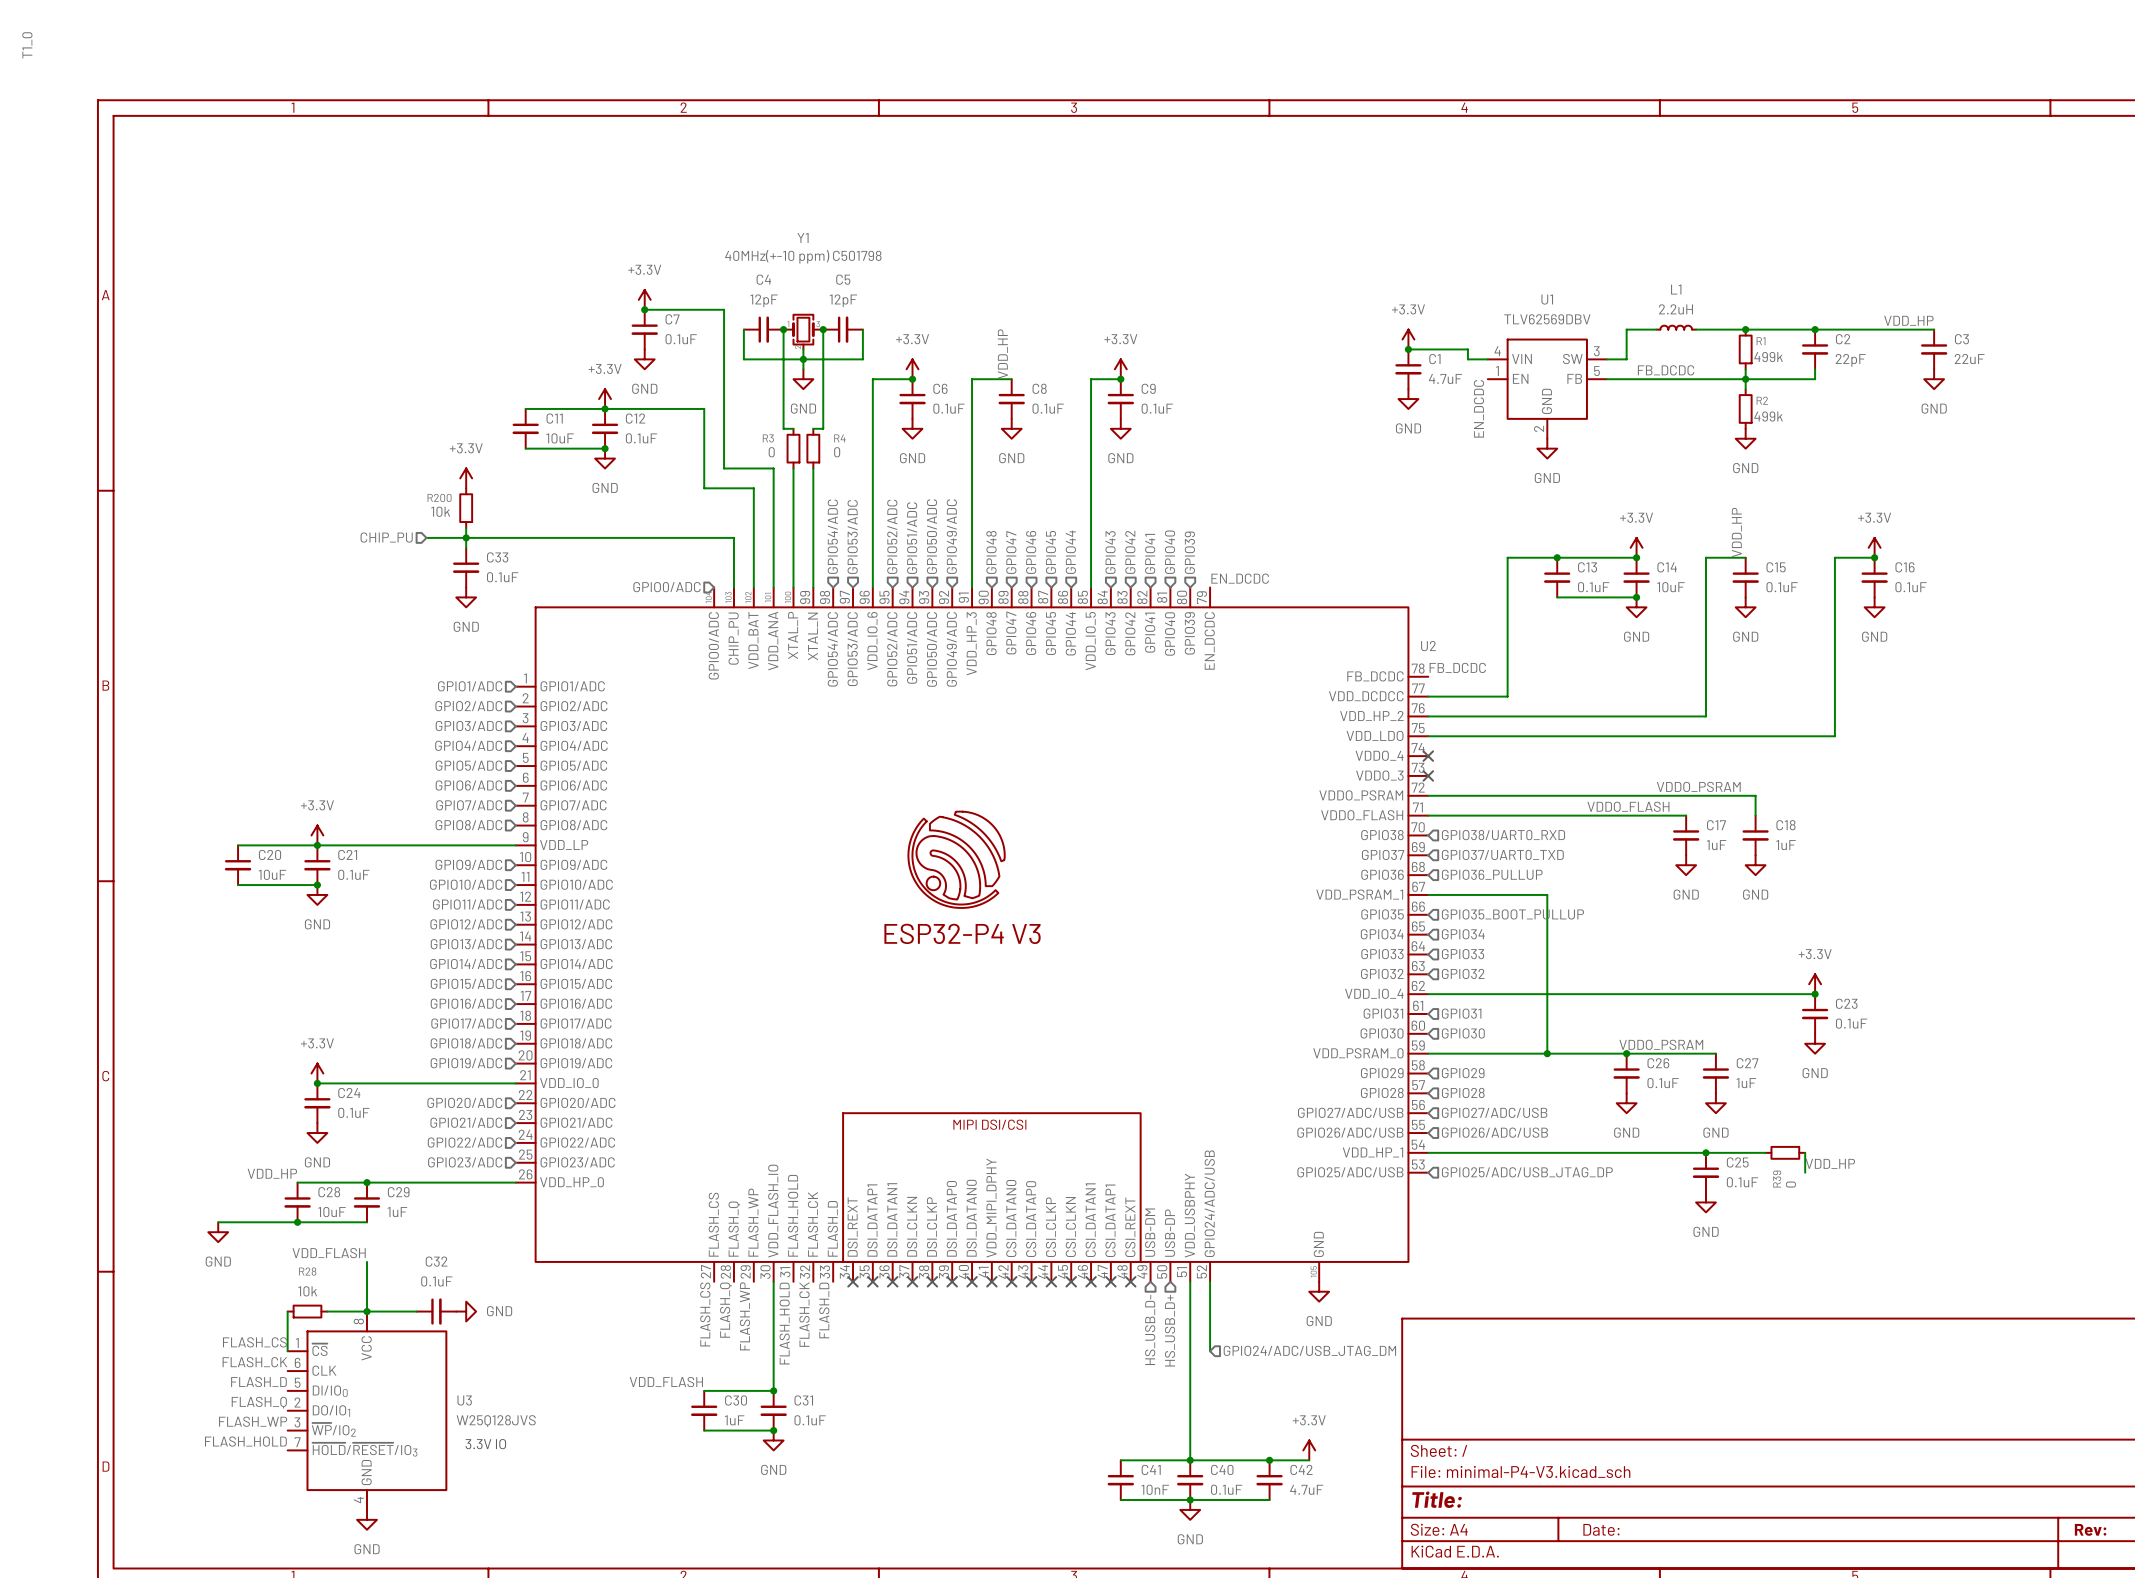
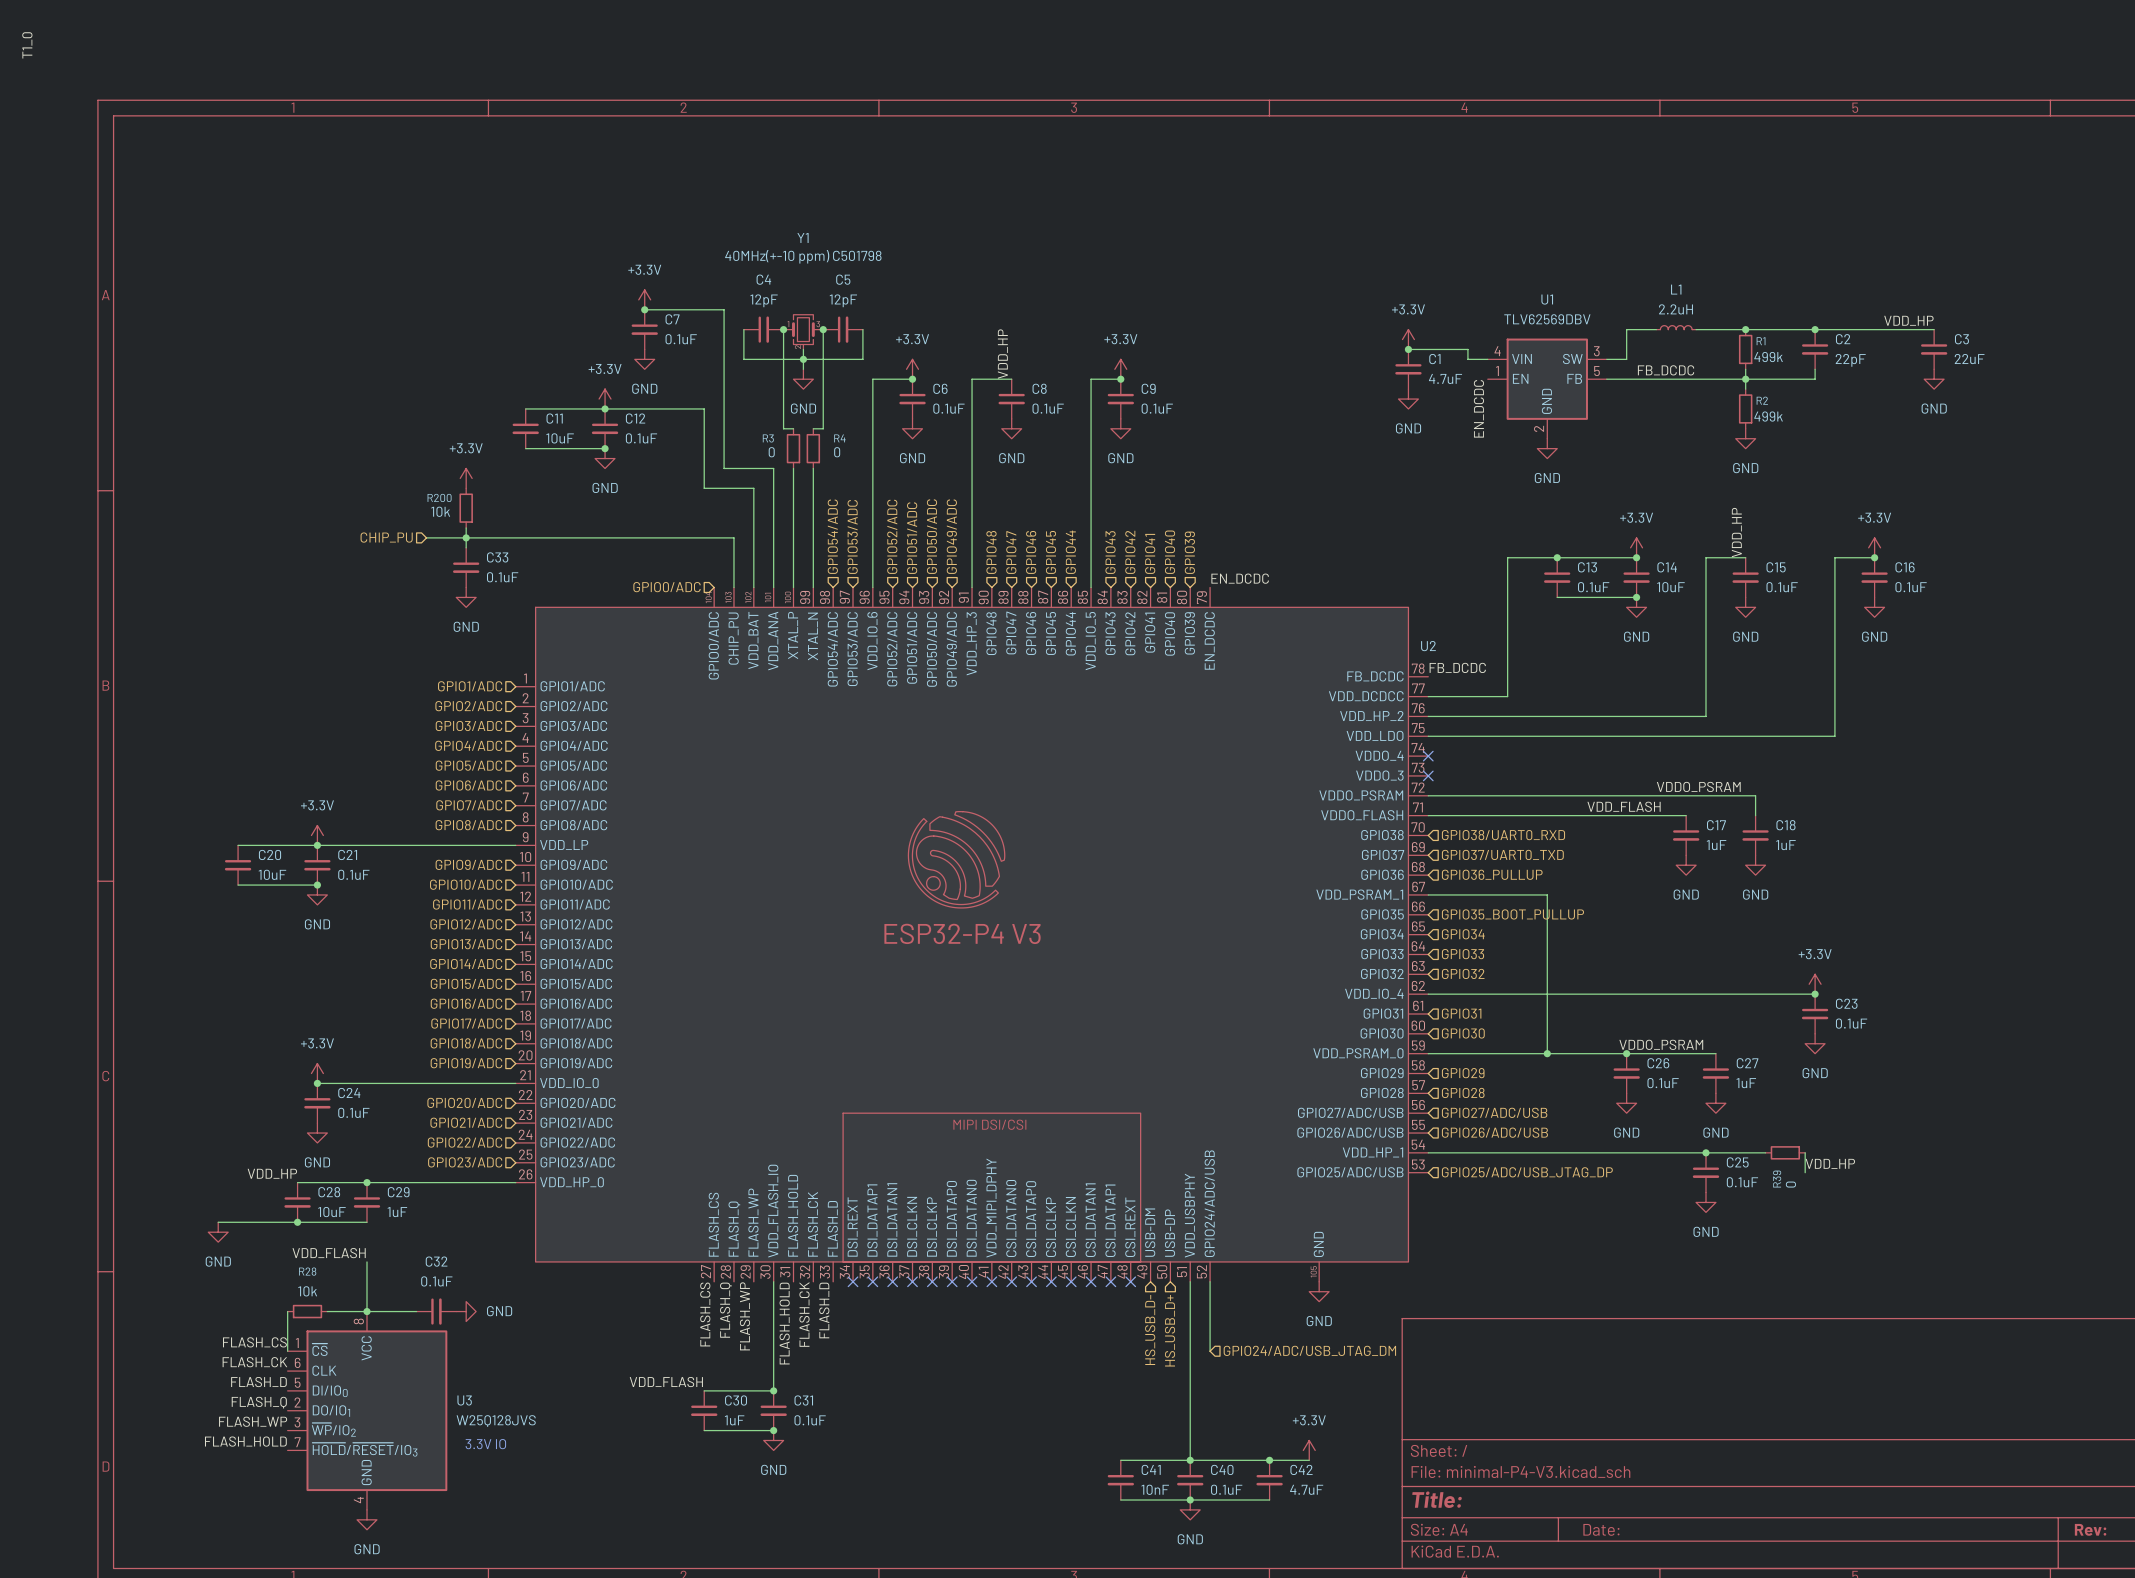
label: VDDO_FLASH (1628, 806) -> VDD_FLASH (1624, 806)

